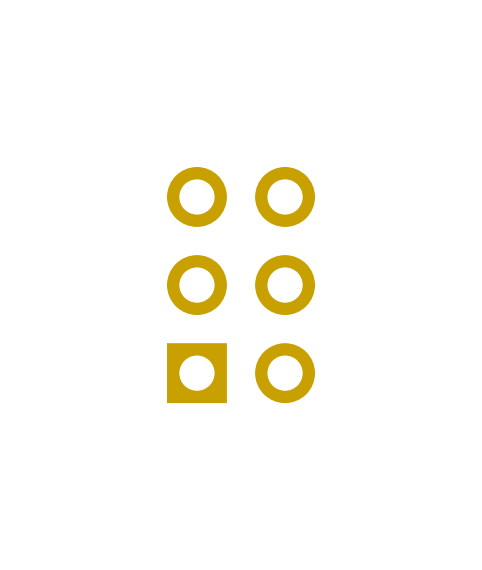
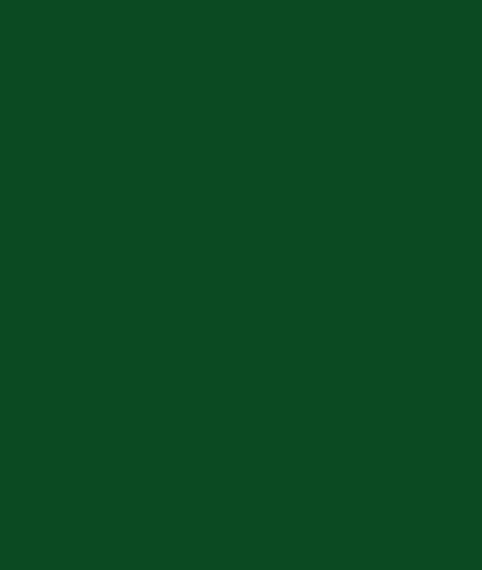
part: (241, 285) -> none

